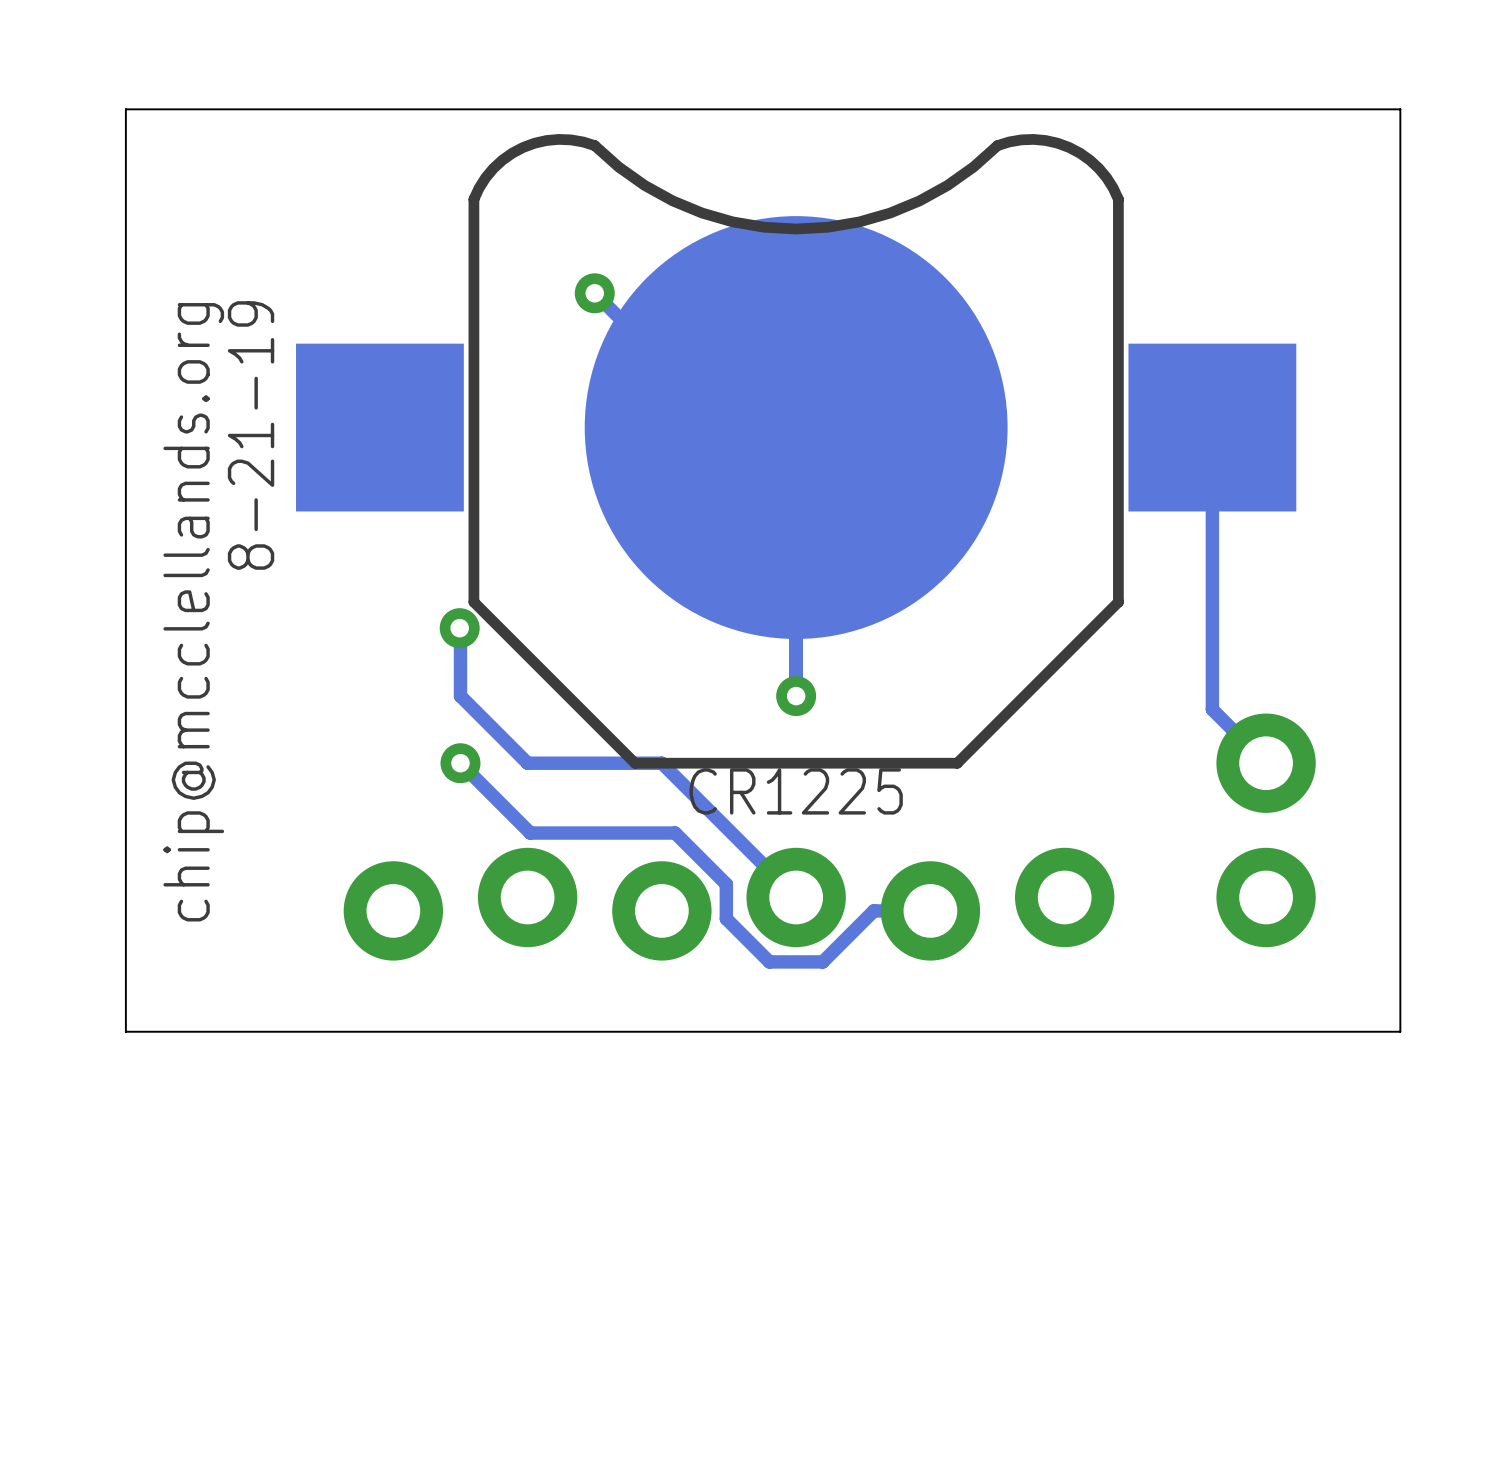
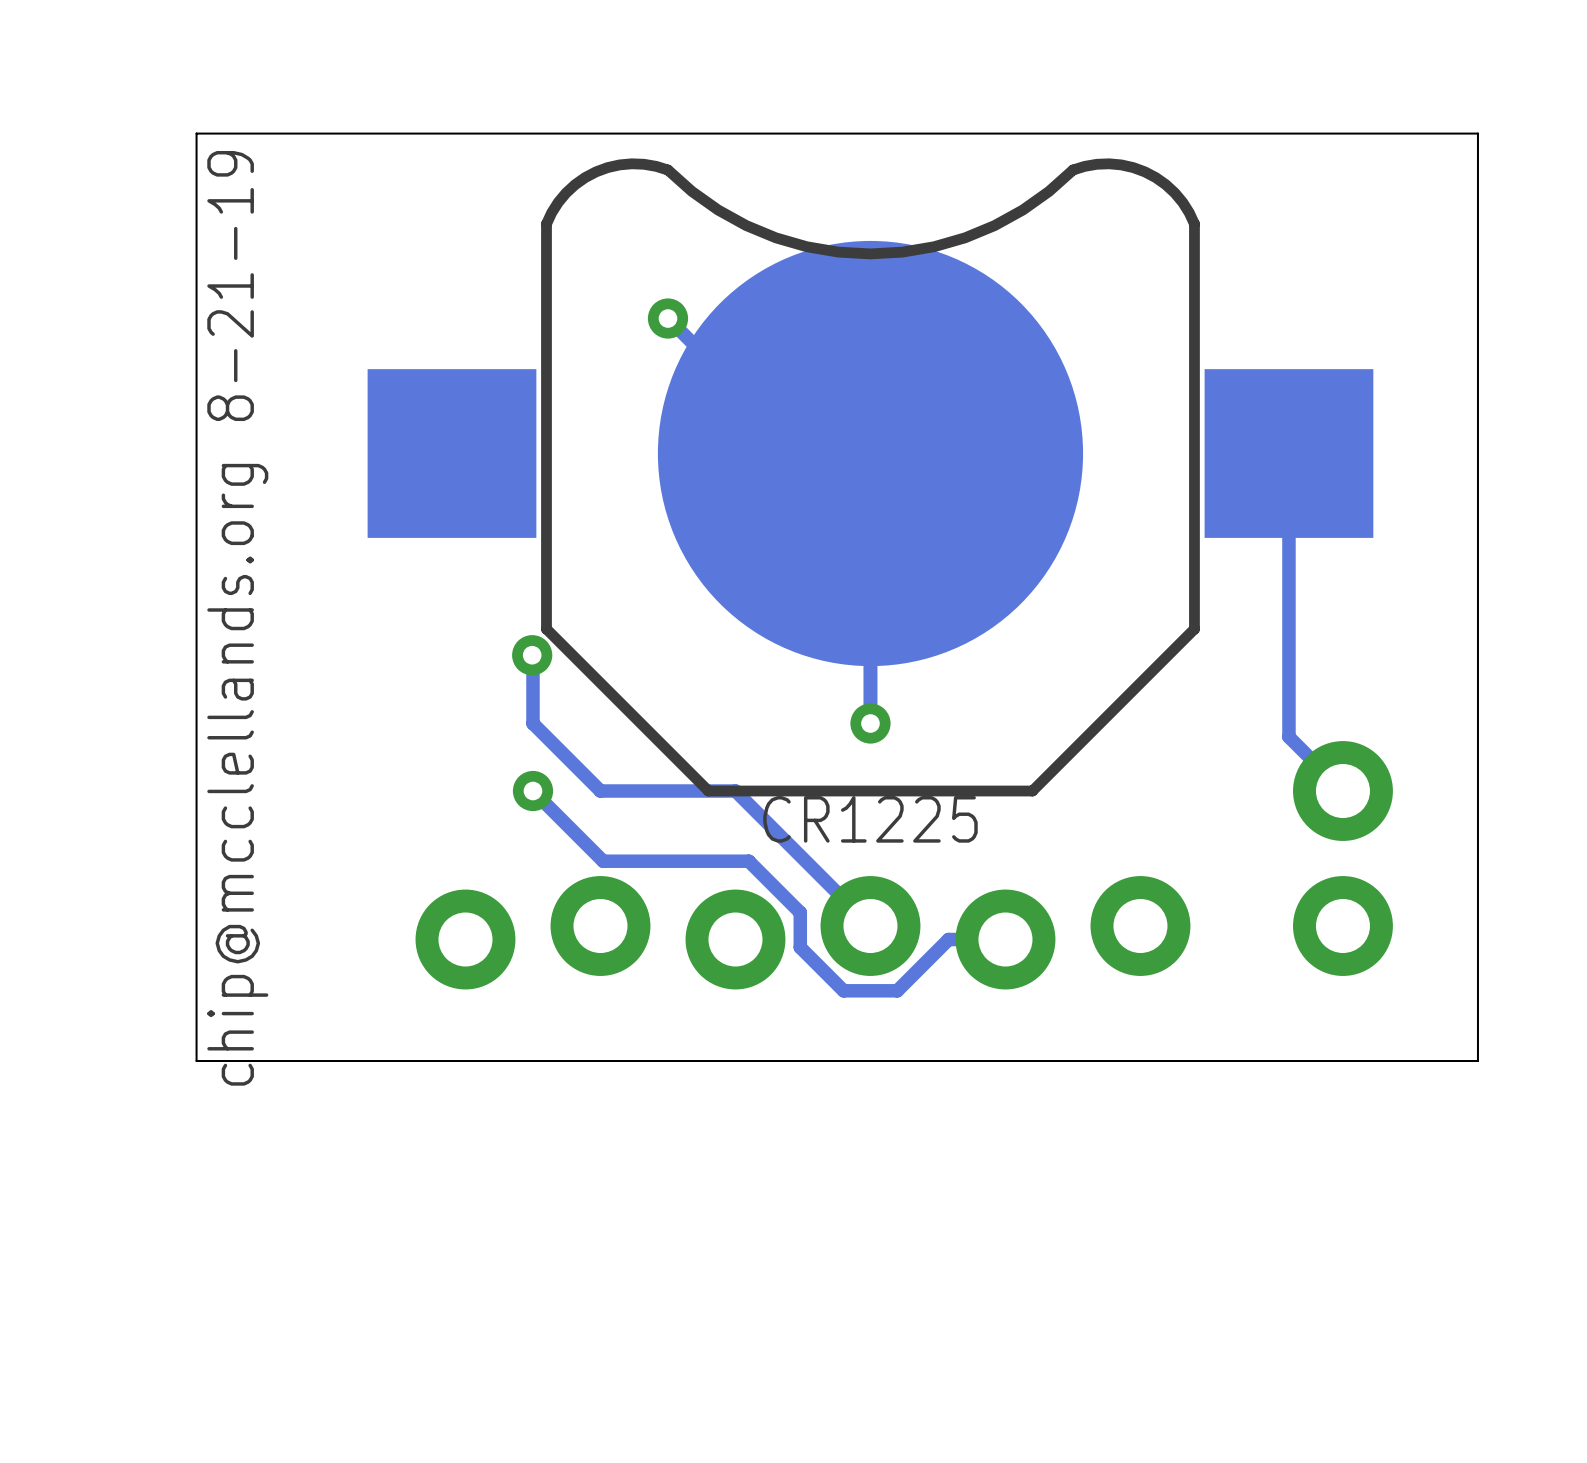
text: 8-21-19 (251, 435) -> none
text: chip@mcclellands.org (193, 612) -> chip@mcclellands.org 8-21-19 (237, 618)

